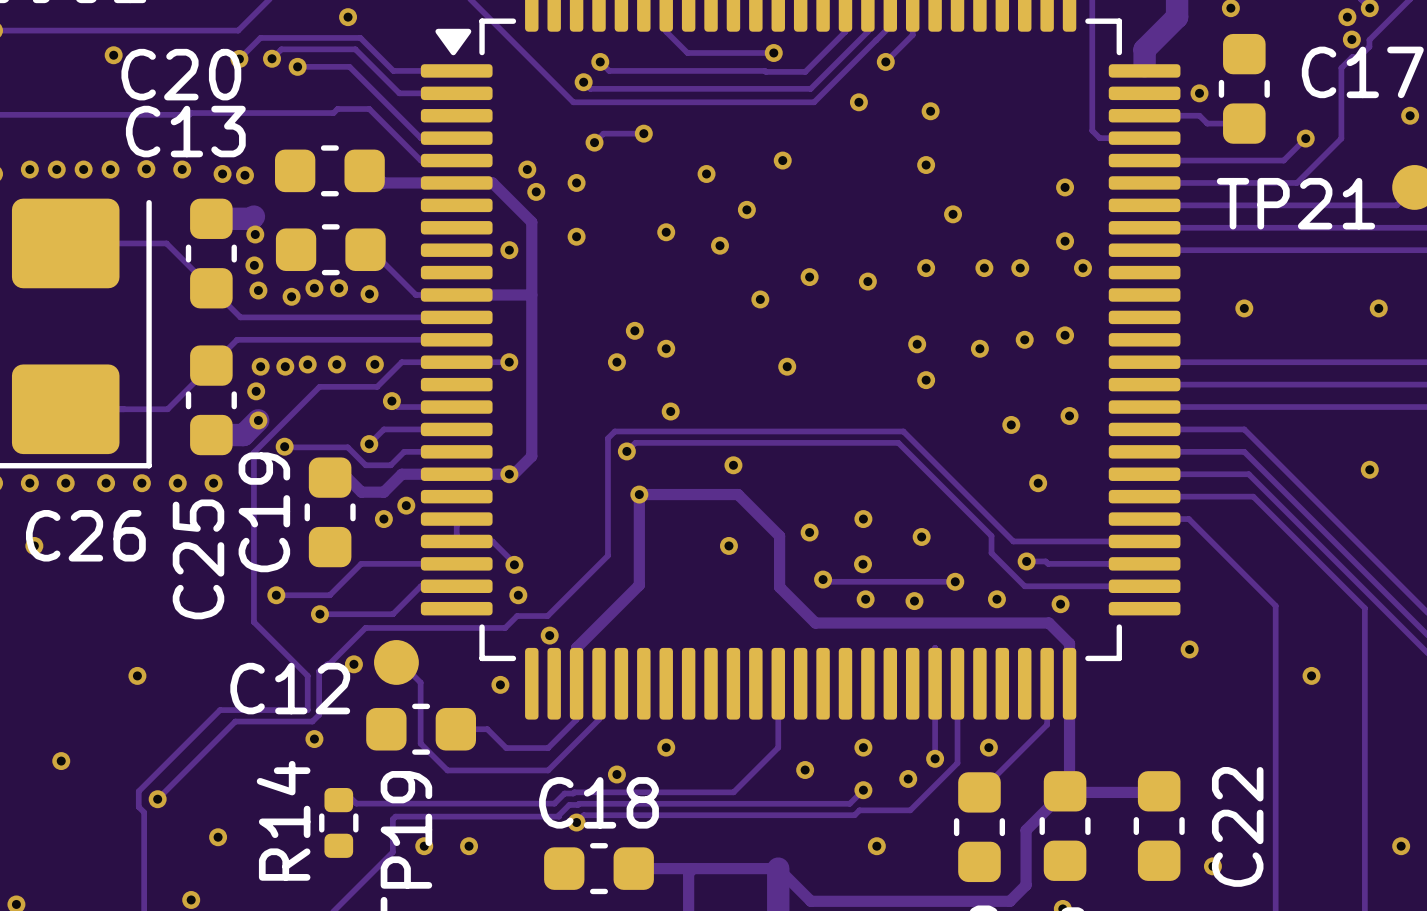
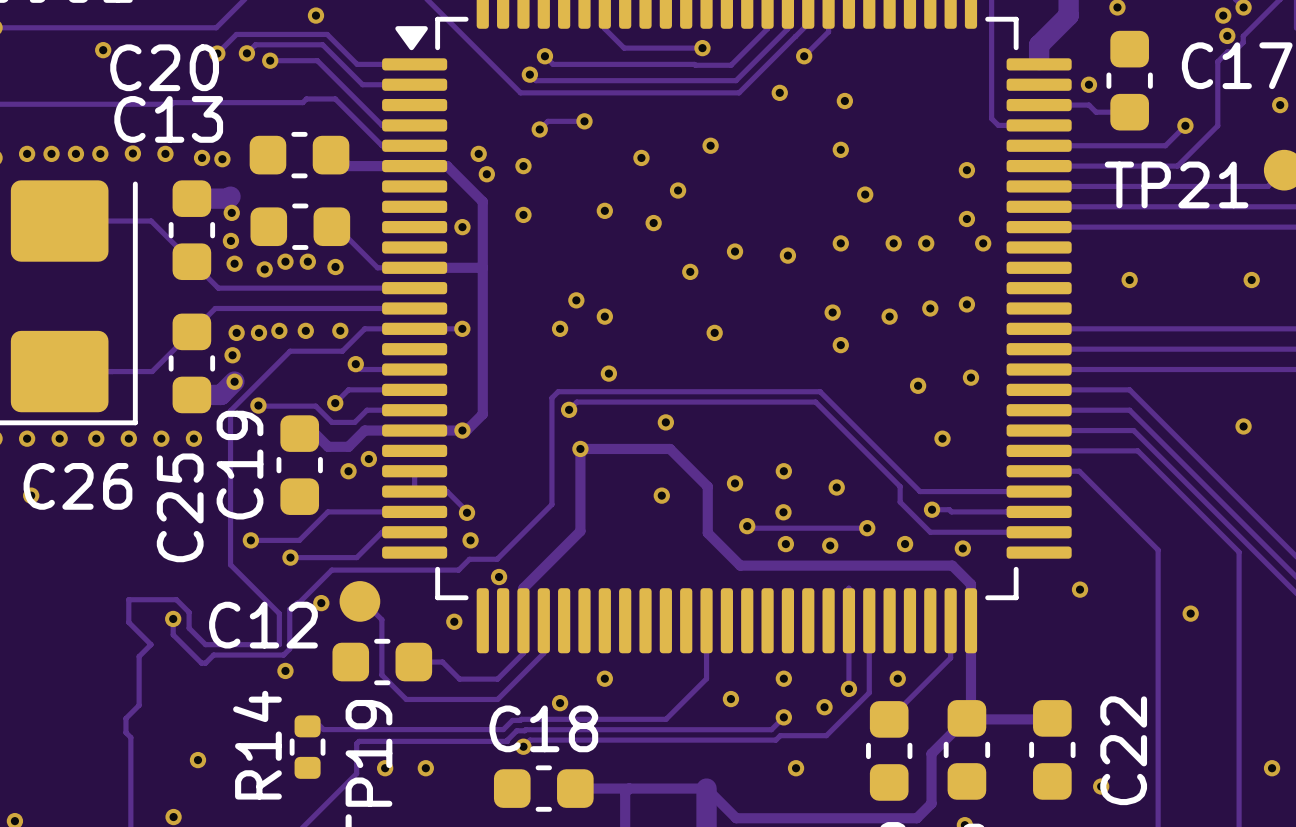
via position: (137, 675) -> (173, 618)
track: (226, 710) (220, 710) (153, 776) -> (205, 644) (189, 628) (189, 612) (176, 599) (128, 599) (128, 622) (151, 644) (139, 656) (139, 705)
track: (226, 730) (157, 799) -> (205, 663) (201, 663) (173, 634) (173, 618)
via: (61, 761) -> none
via: (157, 799) -> none

